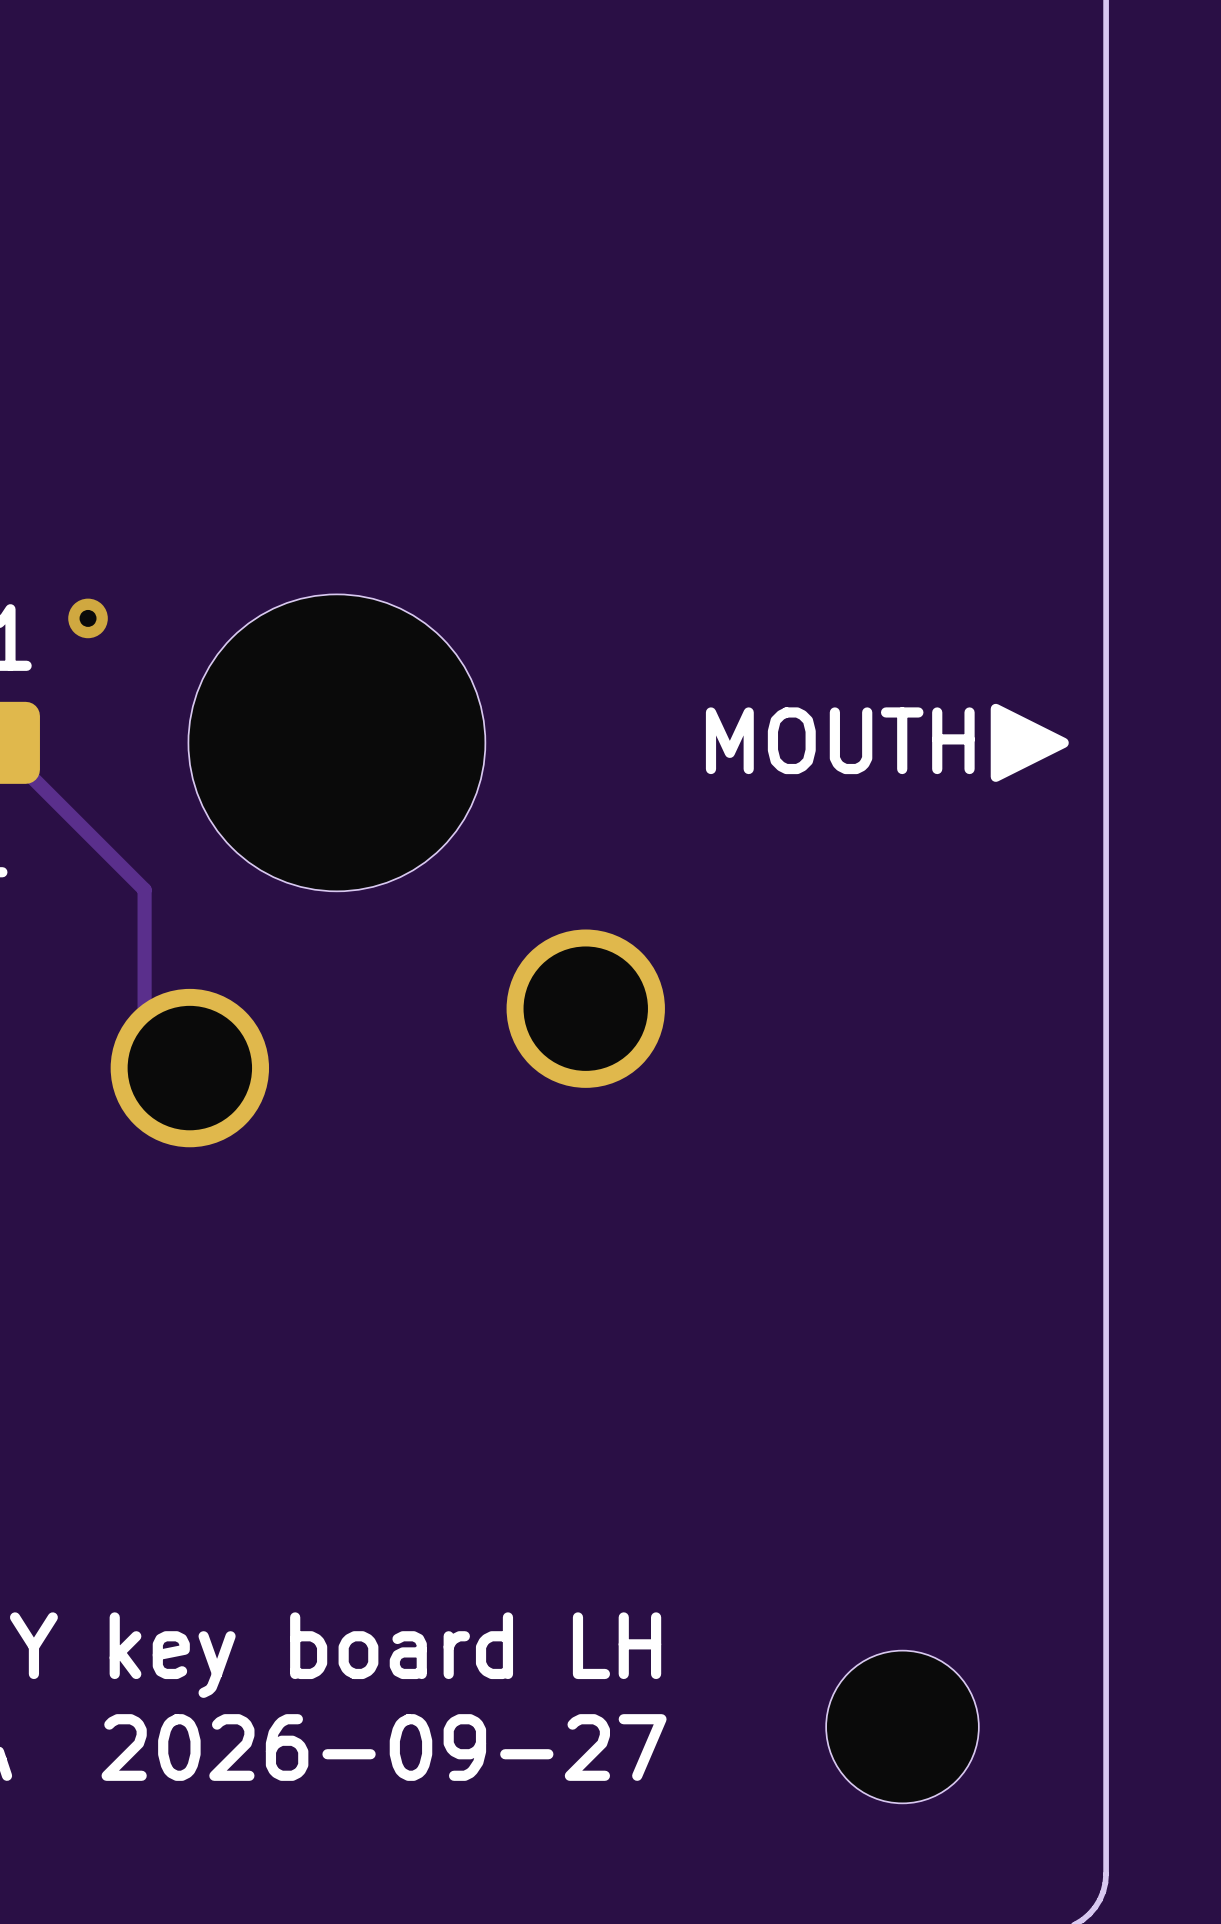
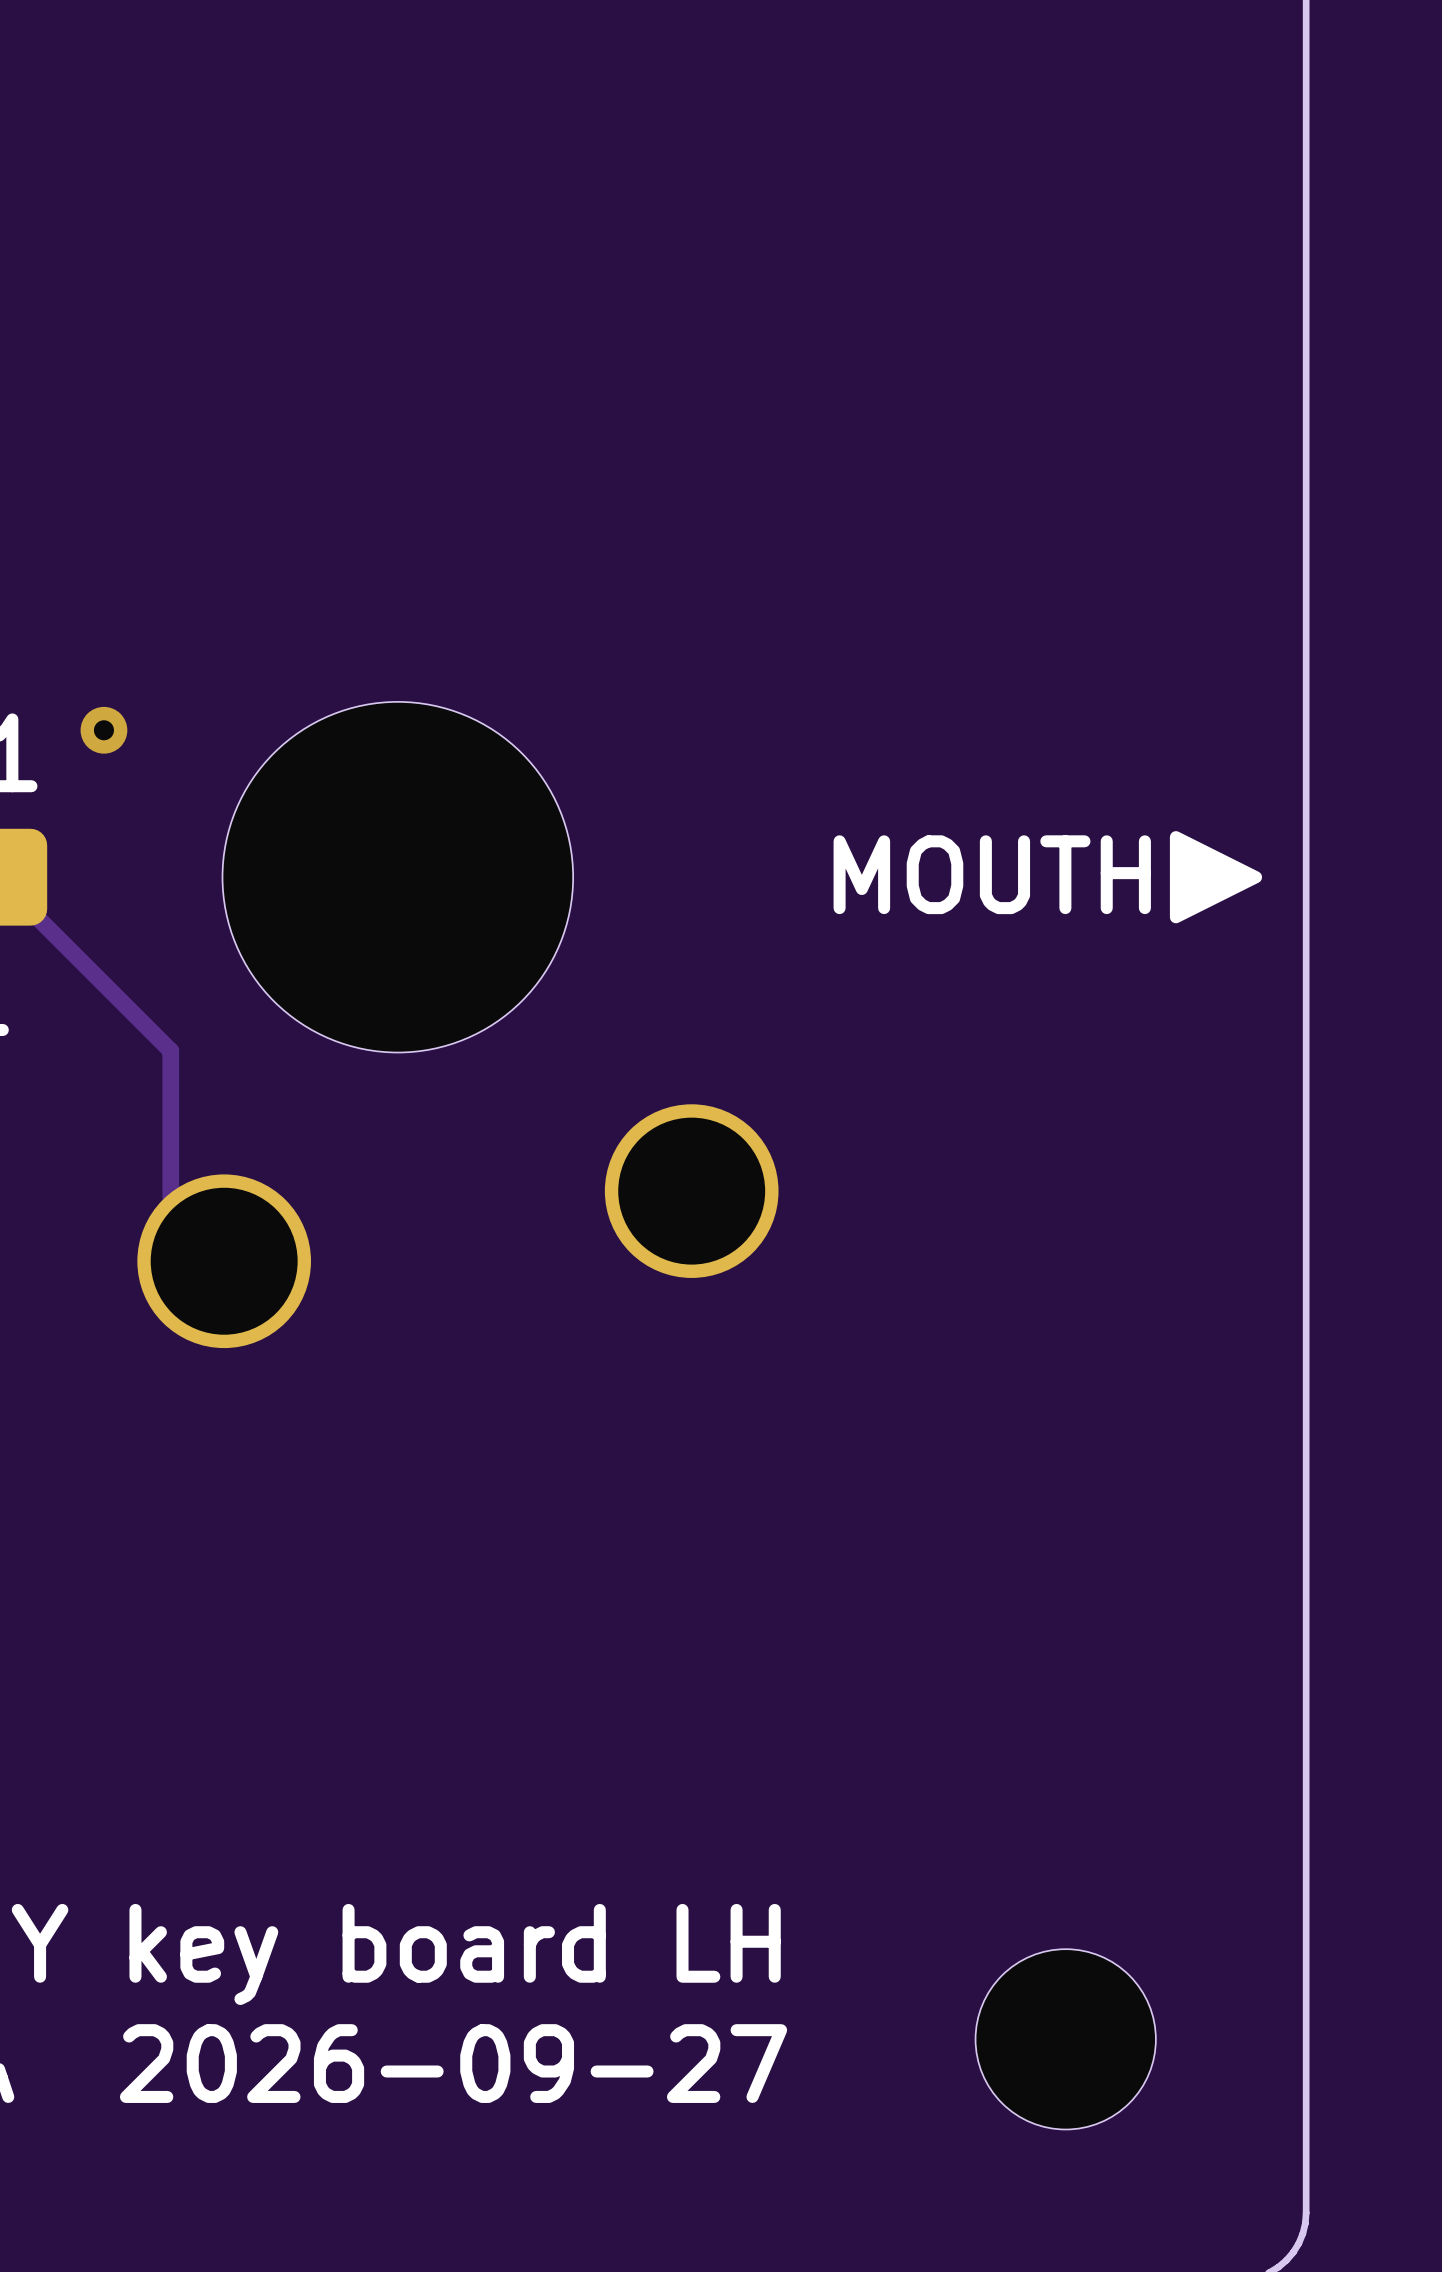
part footprint: [110, 594, 665, 1148] -> [137, 701, 779, 1349]

